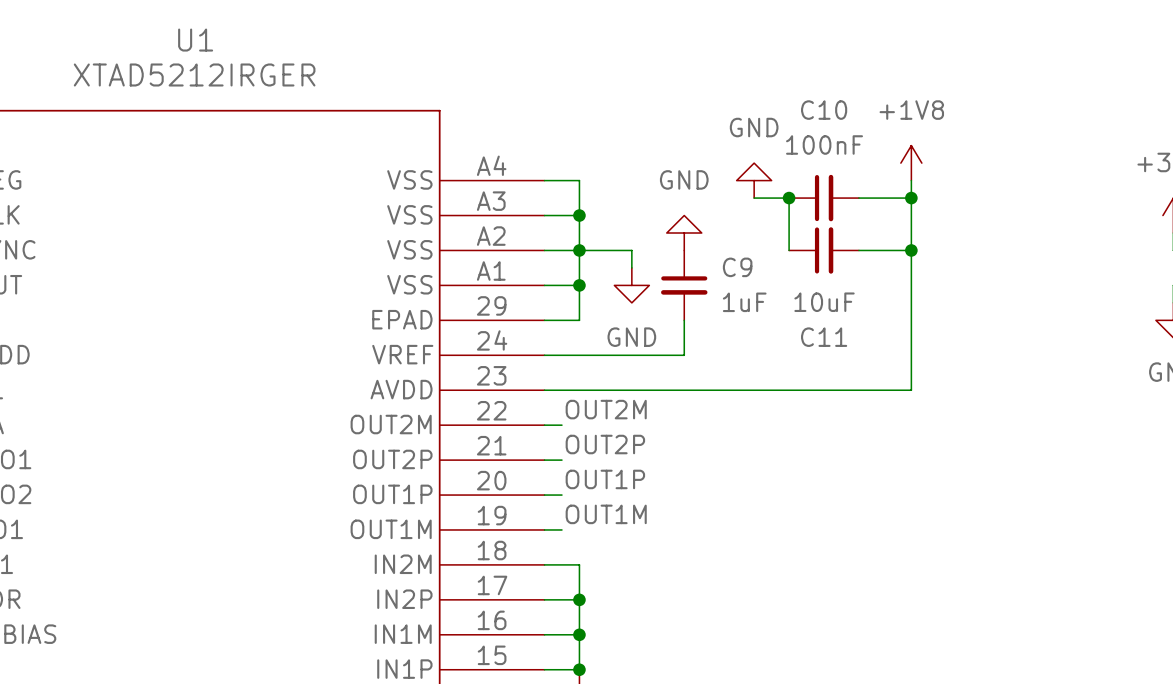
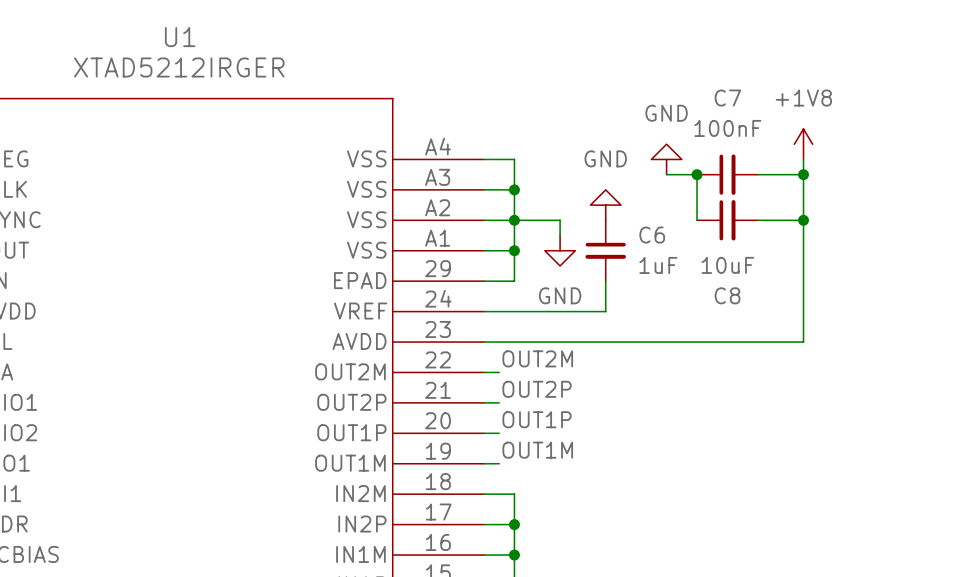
C10 name: C10 (824, 110) -> C7 (727, 98)
C9 name: C9 (737, 267) -> C6 (652, 235)
C11 name: C11 (824, 337) -> C8 (727, 295)

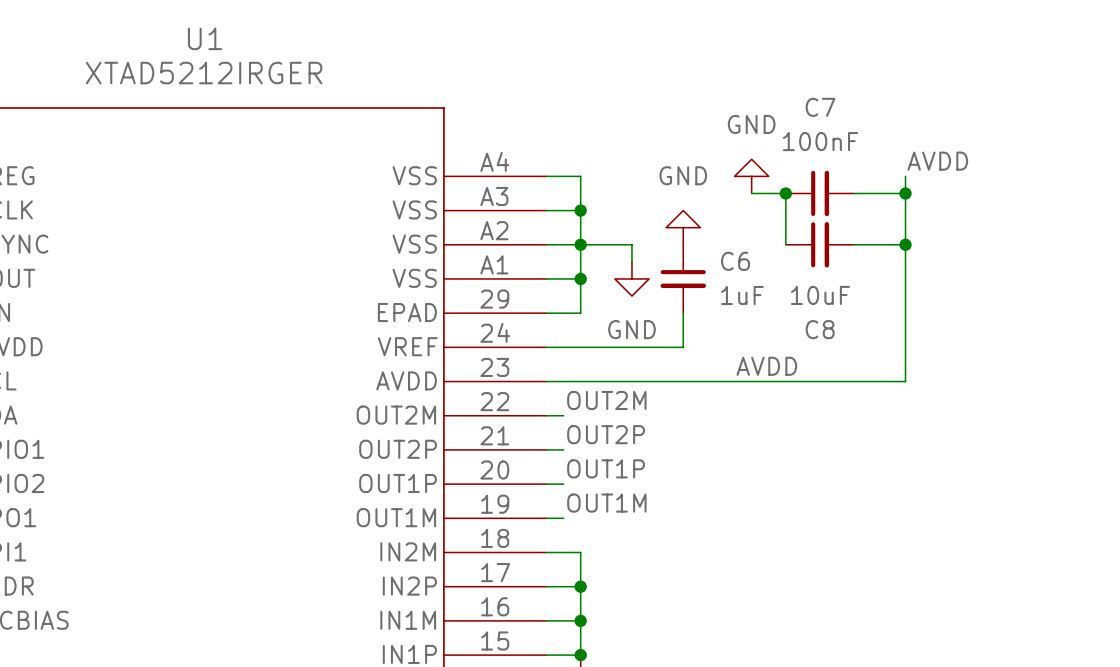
power symbol: +1V8 (803, 144) -> none
label: none -> AVDD (937, 161)
label: none -> AVDD (766, 366)

